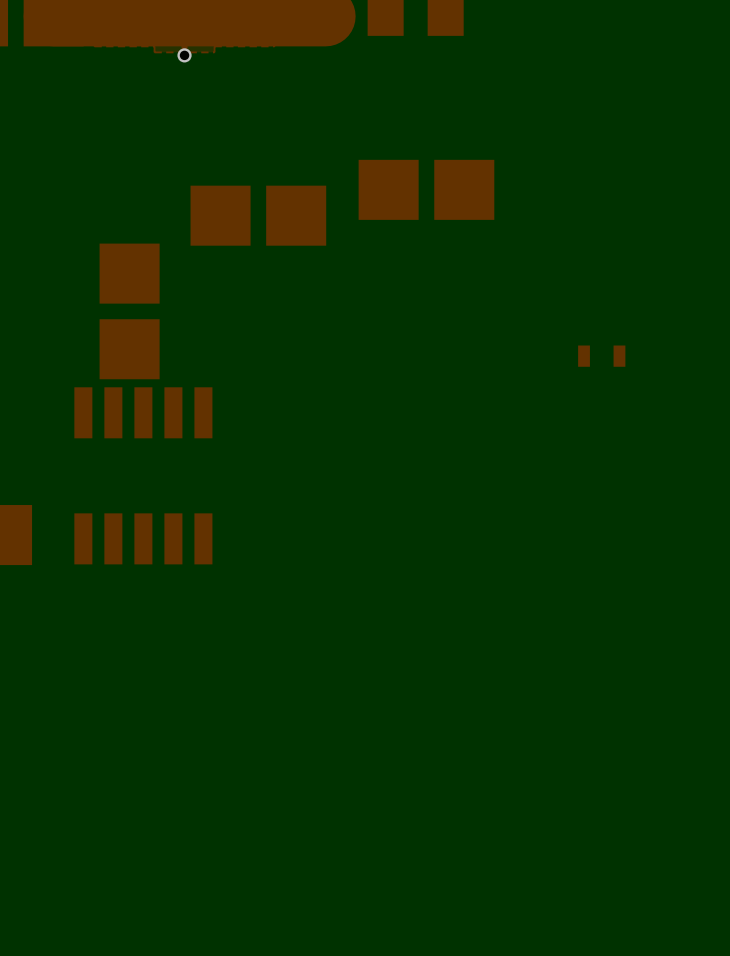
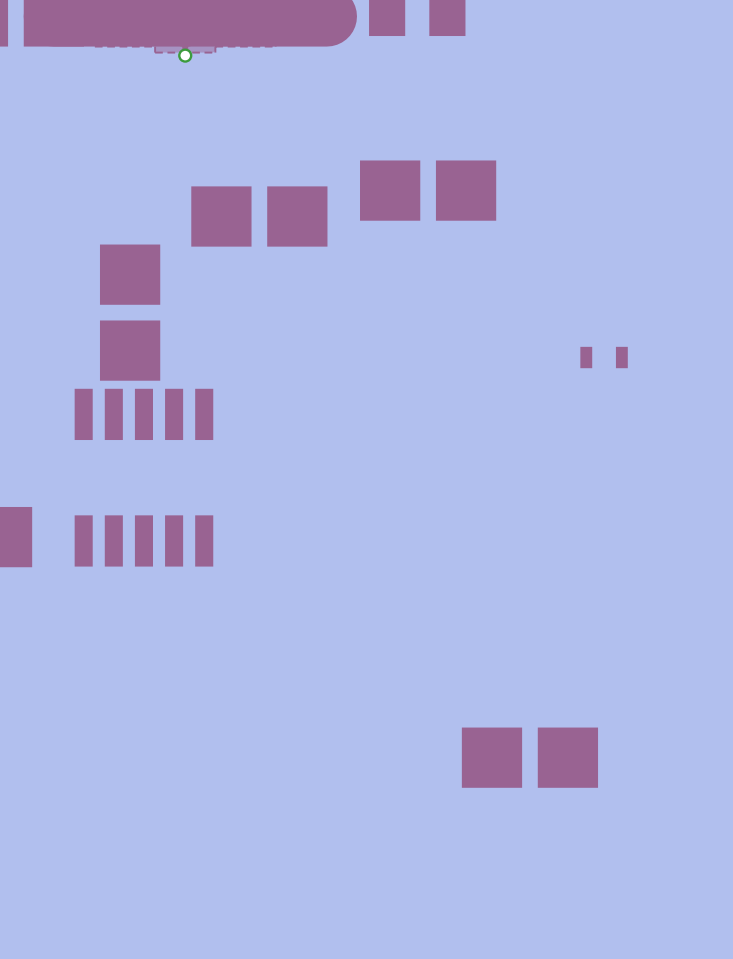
part: none -> (529, 757)

